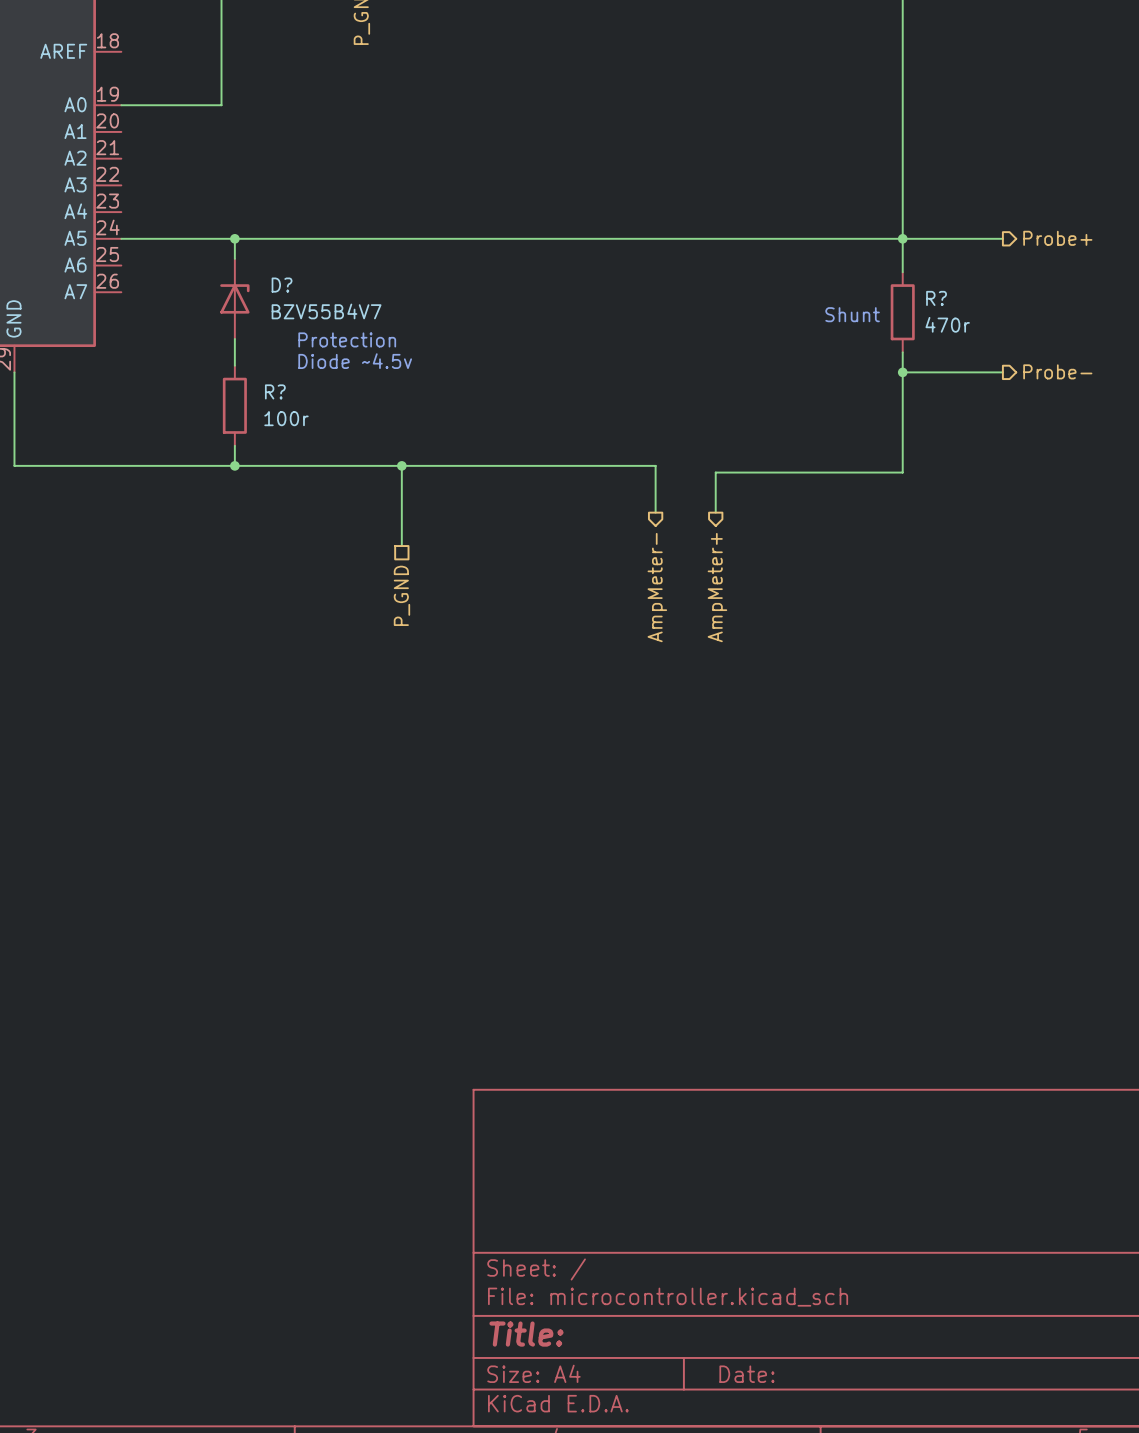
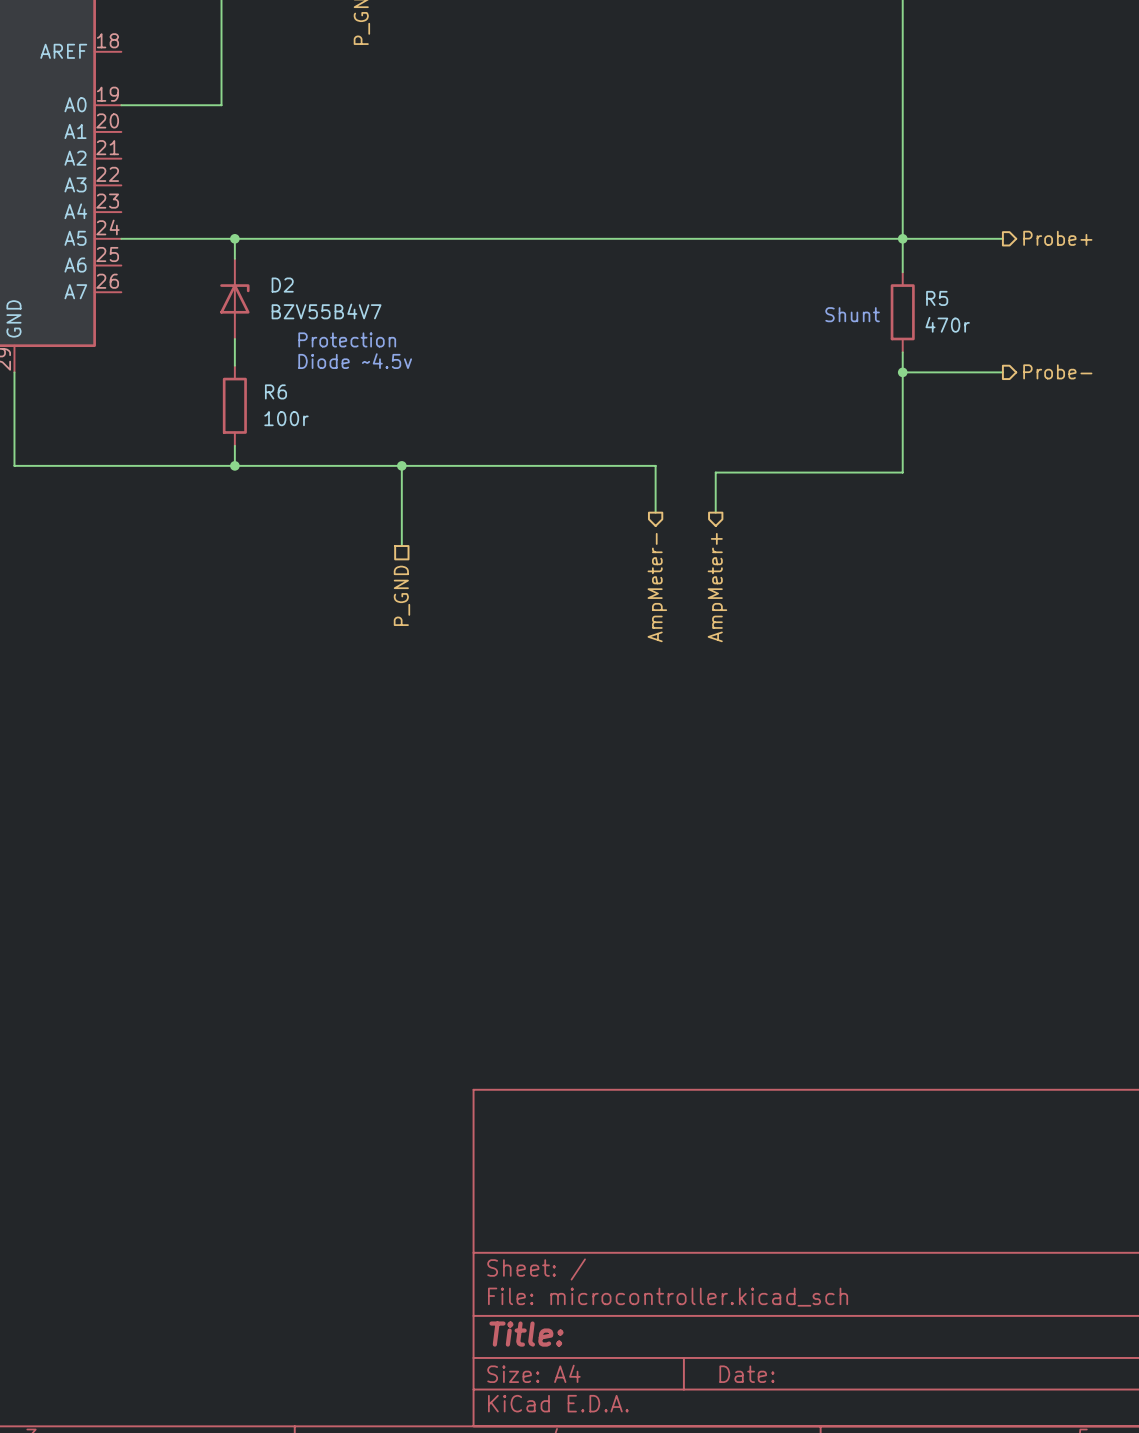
D? name: D? (282, 285) -> D2 (282, 285)
R? name: R? (936, 298) -> R5 (937, 298)
R? name: R? (275, 391) -> R6 (275, 391)

